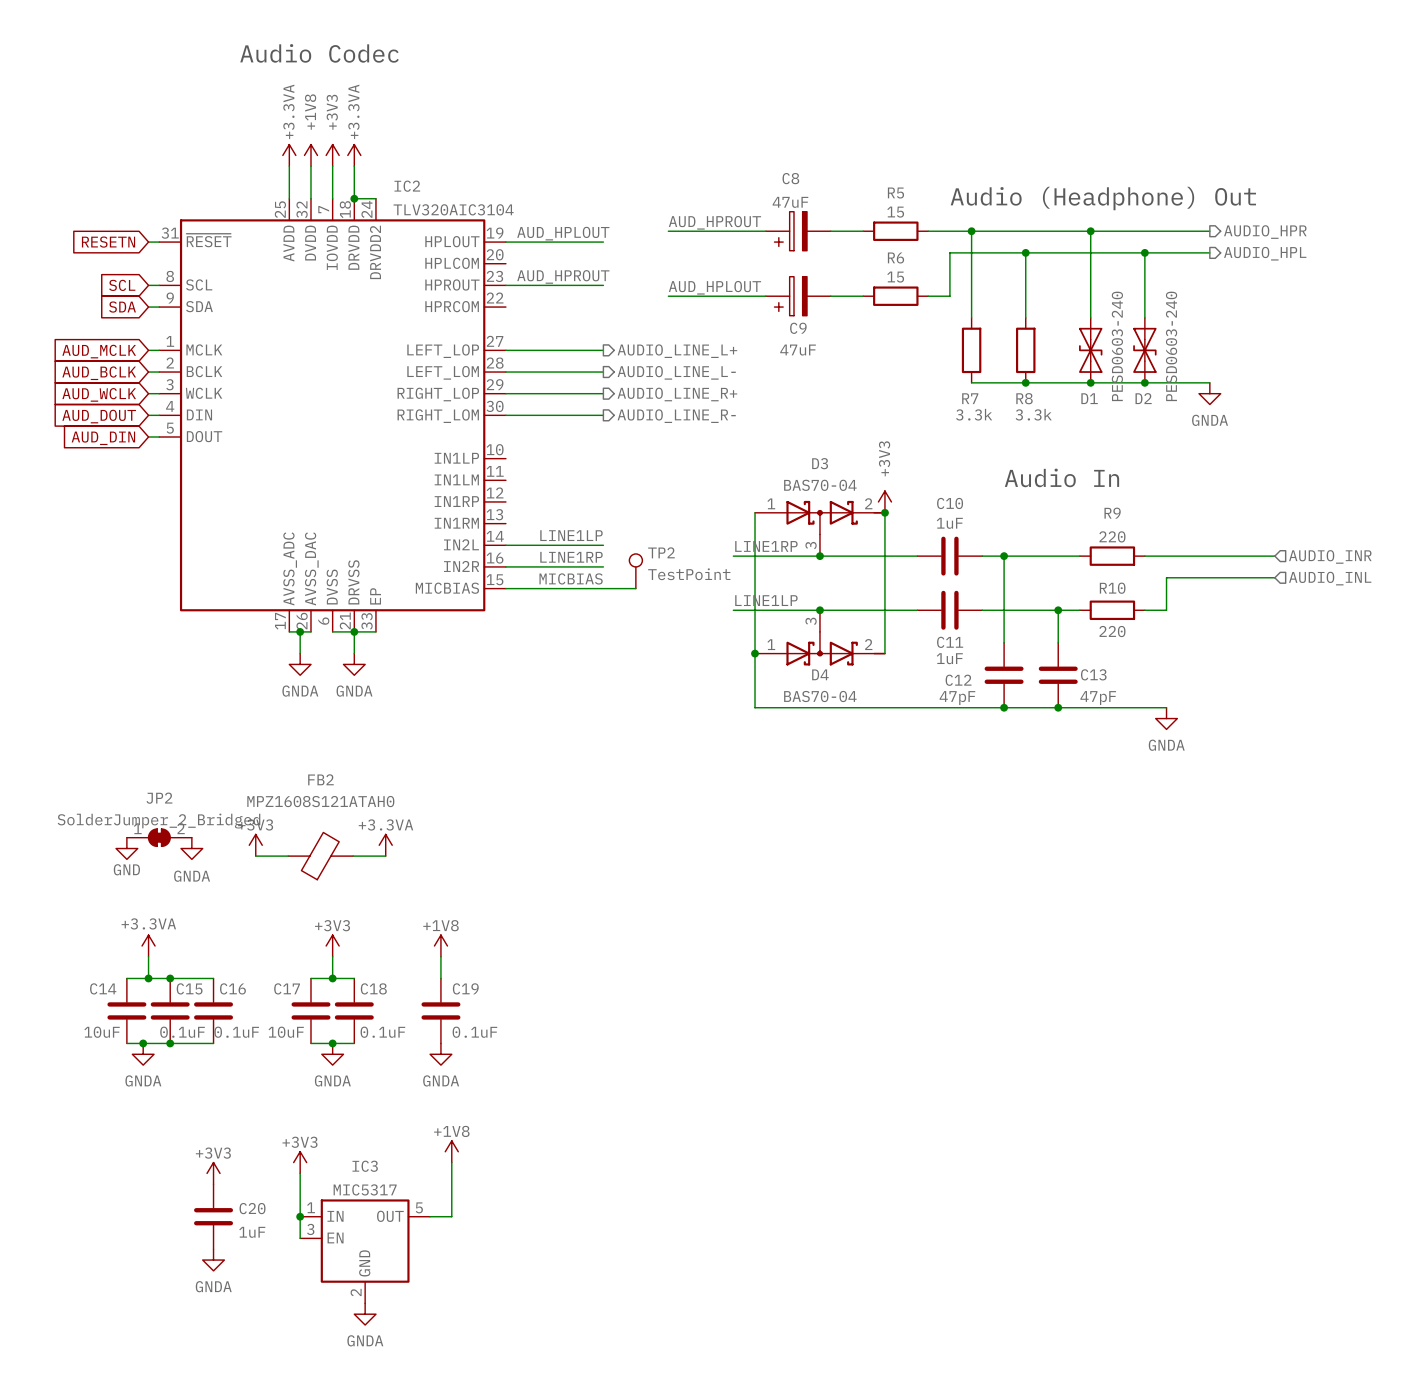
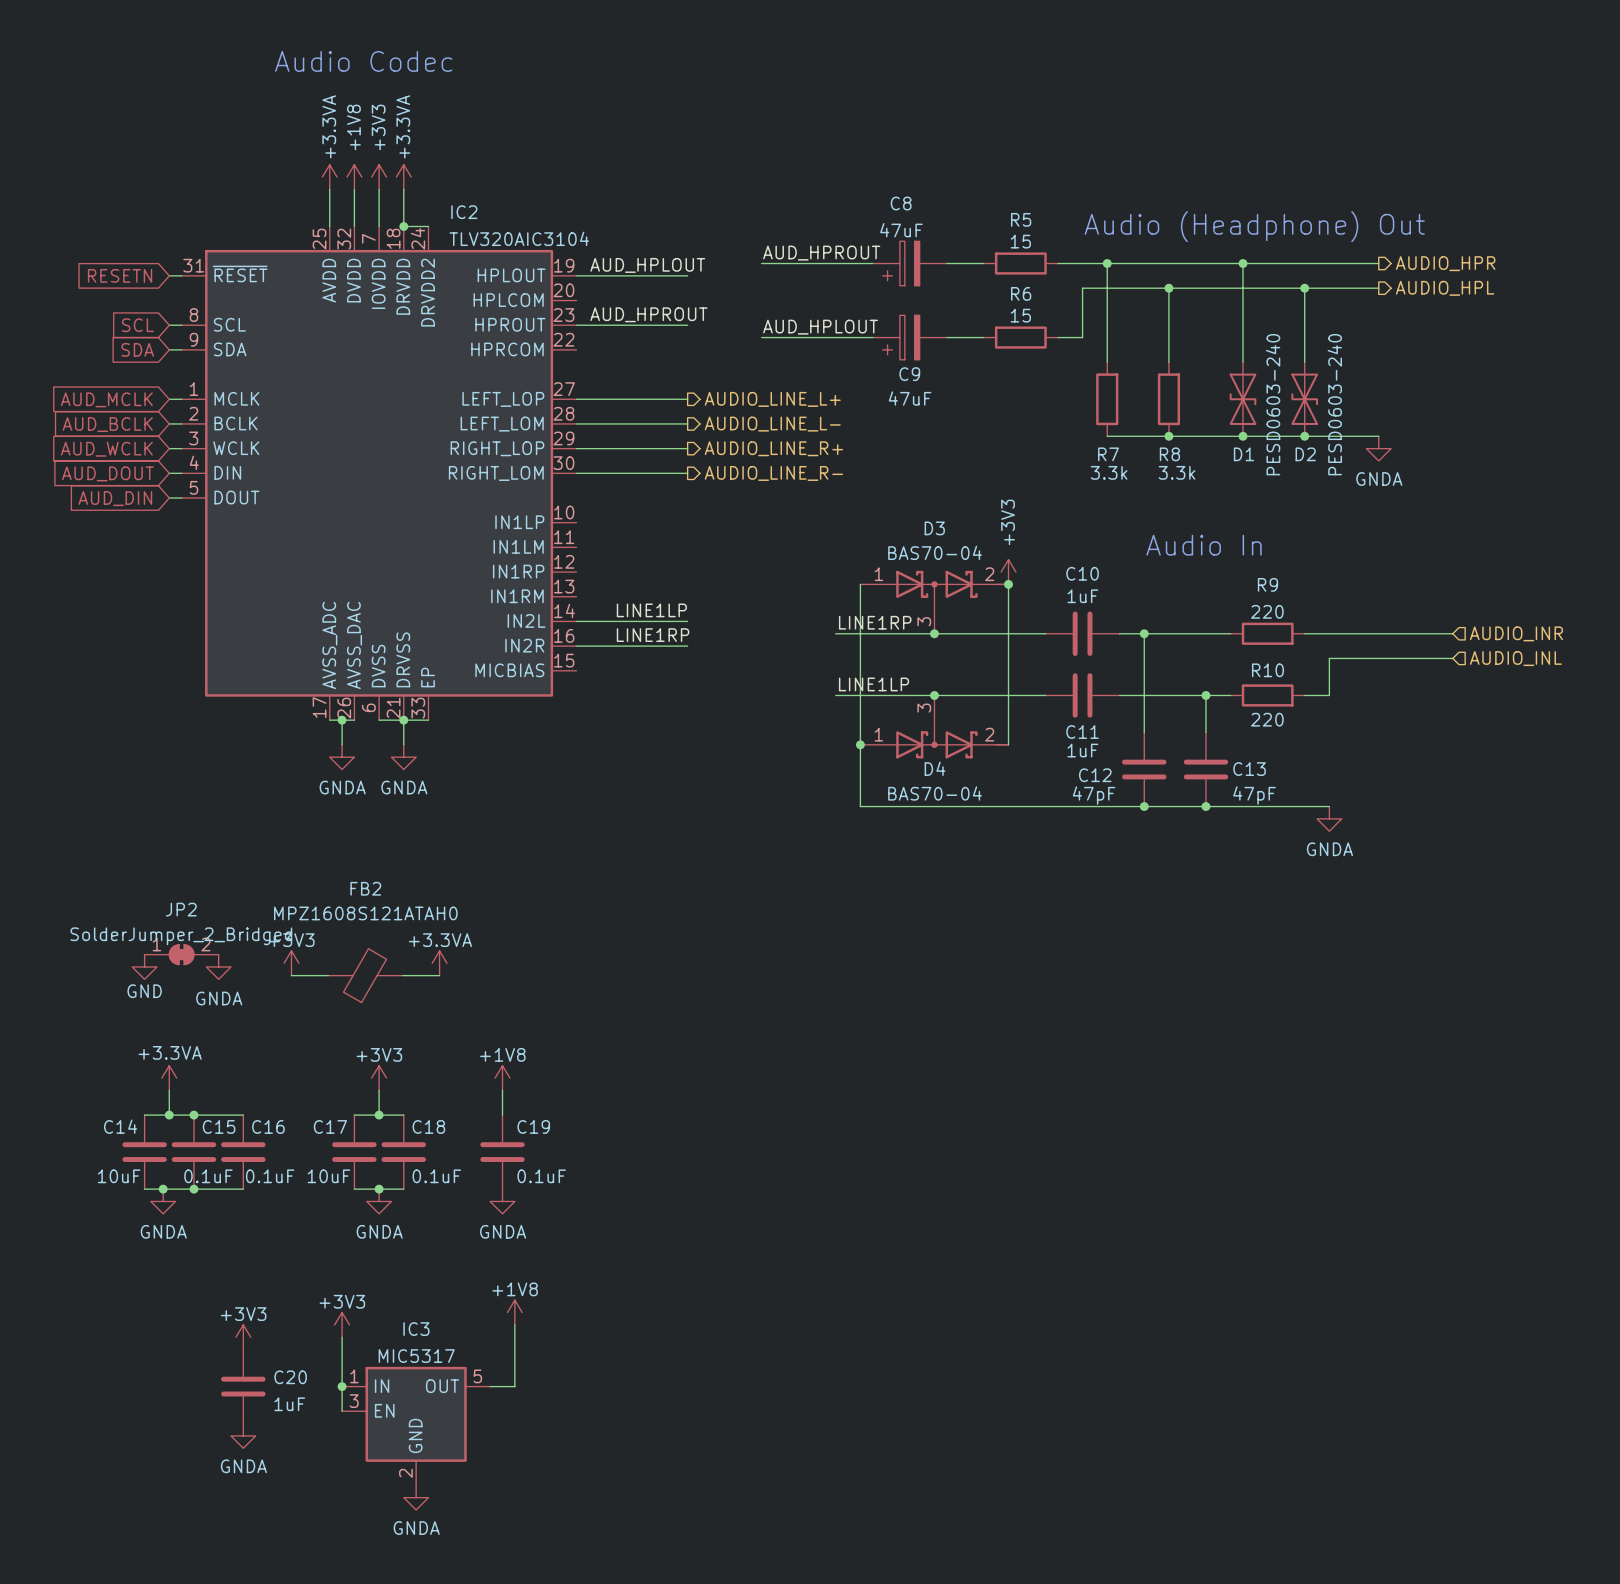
TP2: TestPoint (635, 571) -> none
label: MICBIAS (571, 578) -> none
wire: (505, 588) (635, 588) -> none

